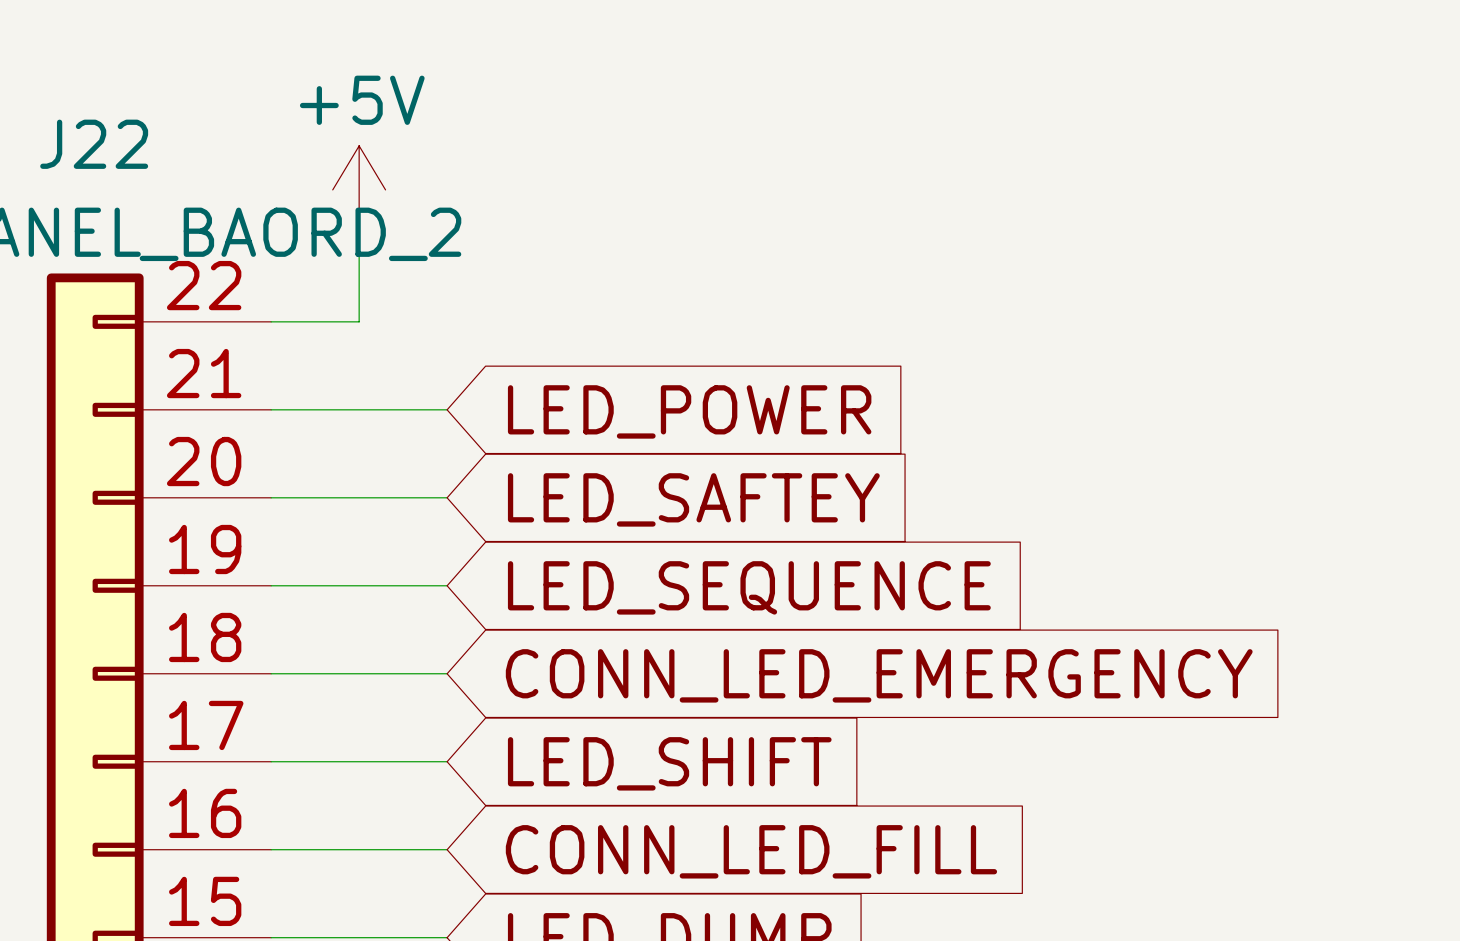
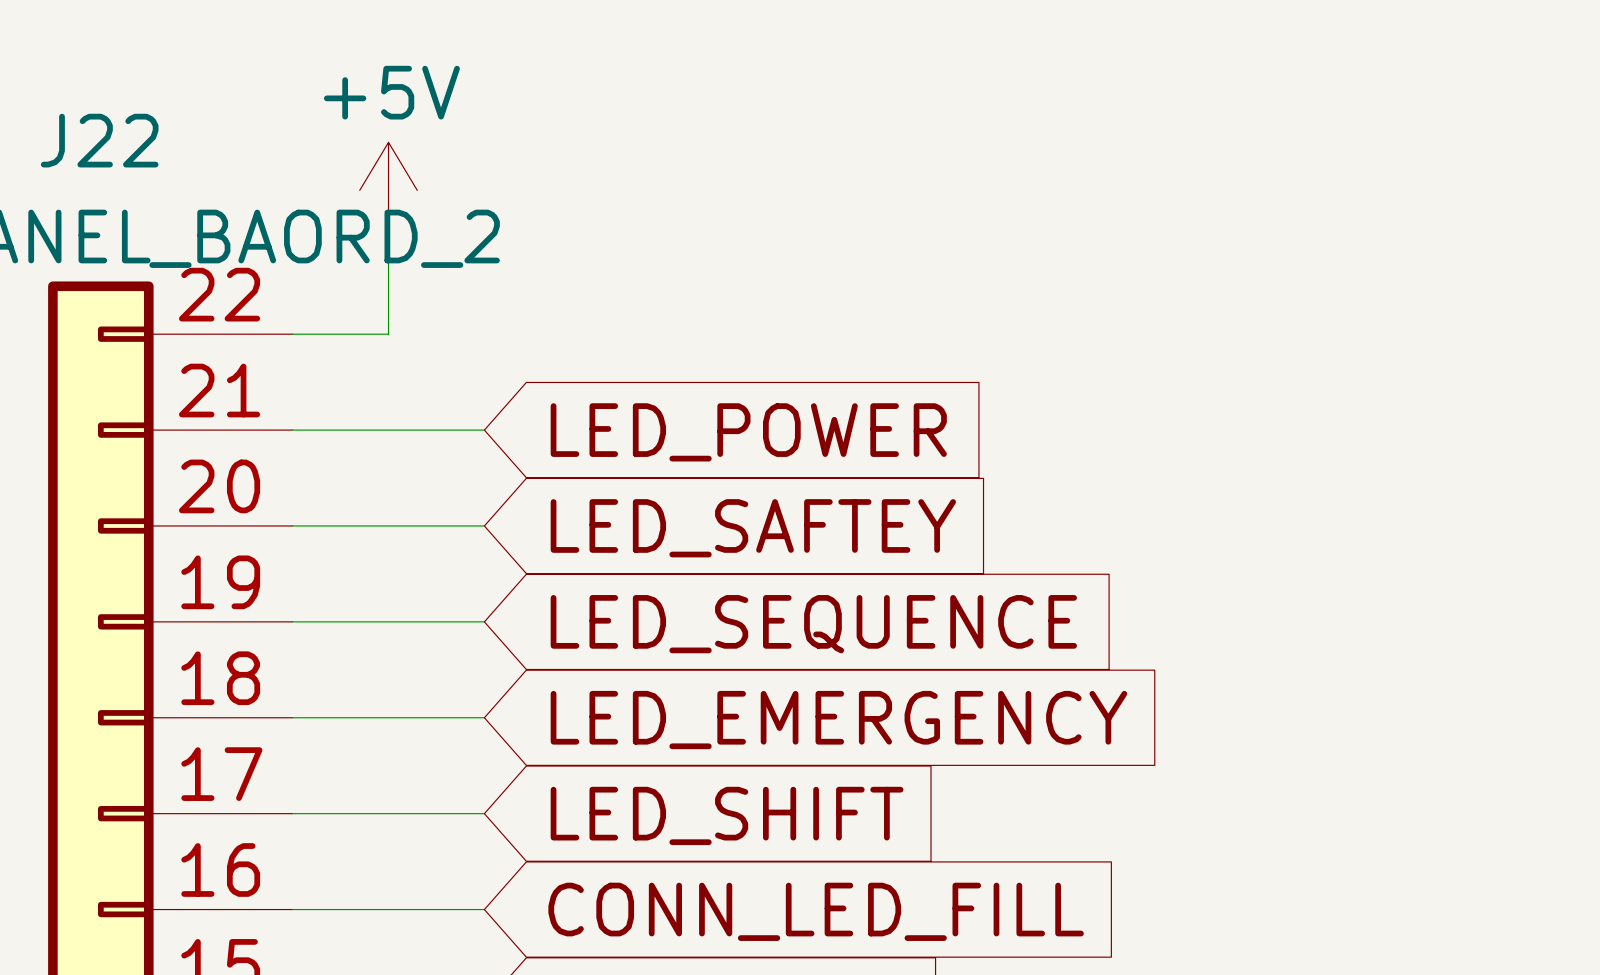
global label: CONN_LED_EMERGENCY (879, 675) -> LED_EMERGENCY (838, 720)

